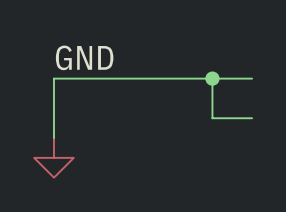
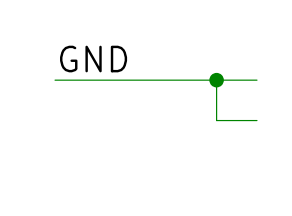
wire: (53, 78) (53, 138) -> none
power symbol: (53, 157) -> none

